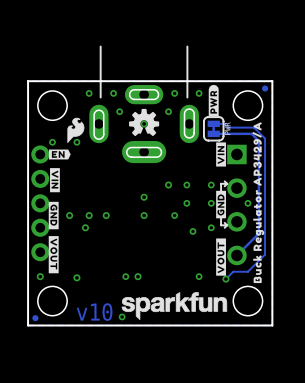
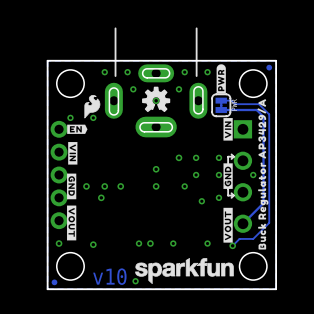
via: none -> (173, 243)

